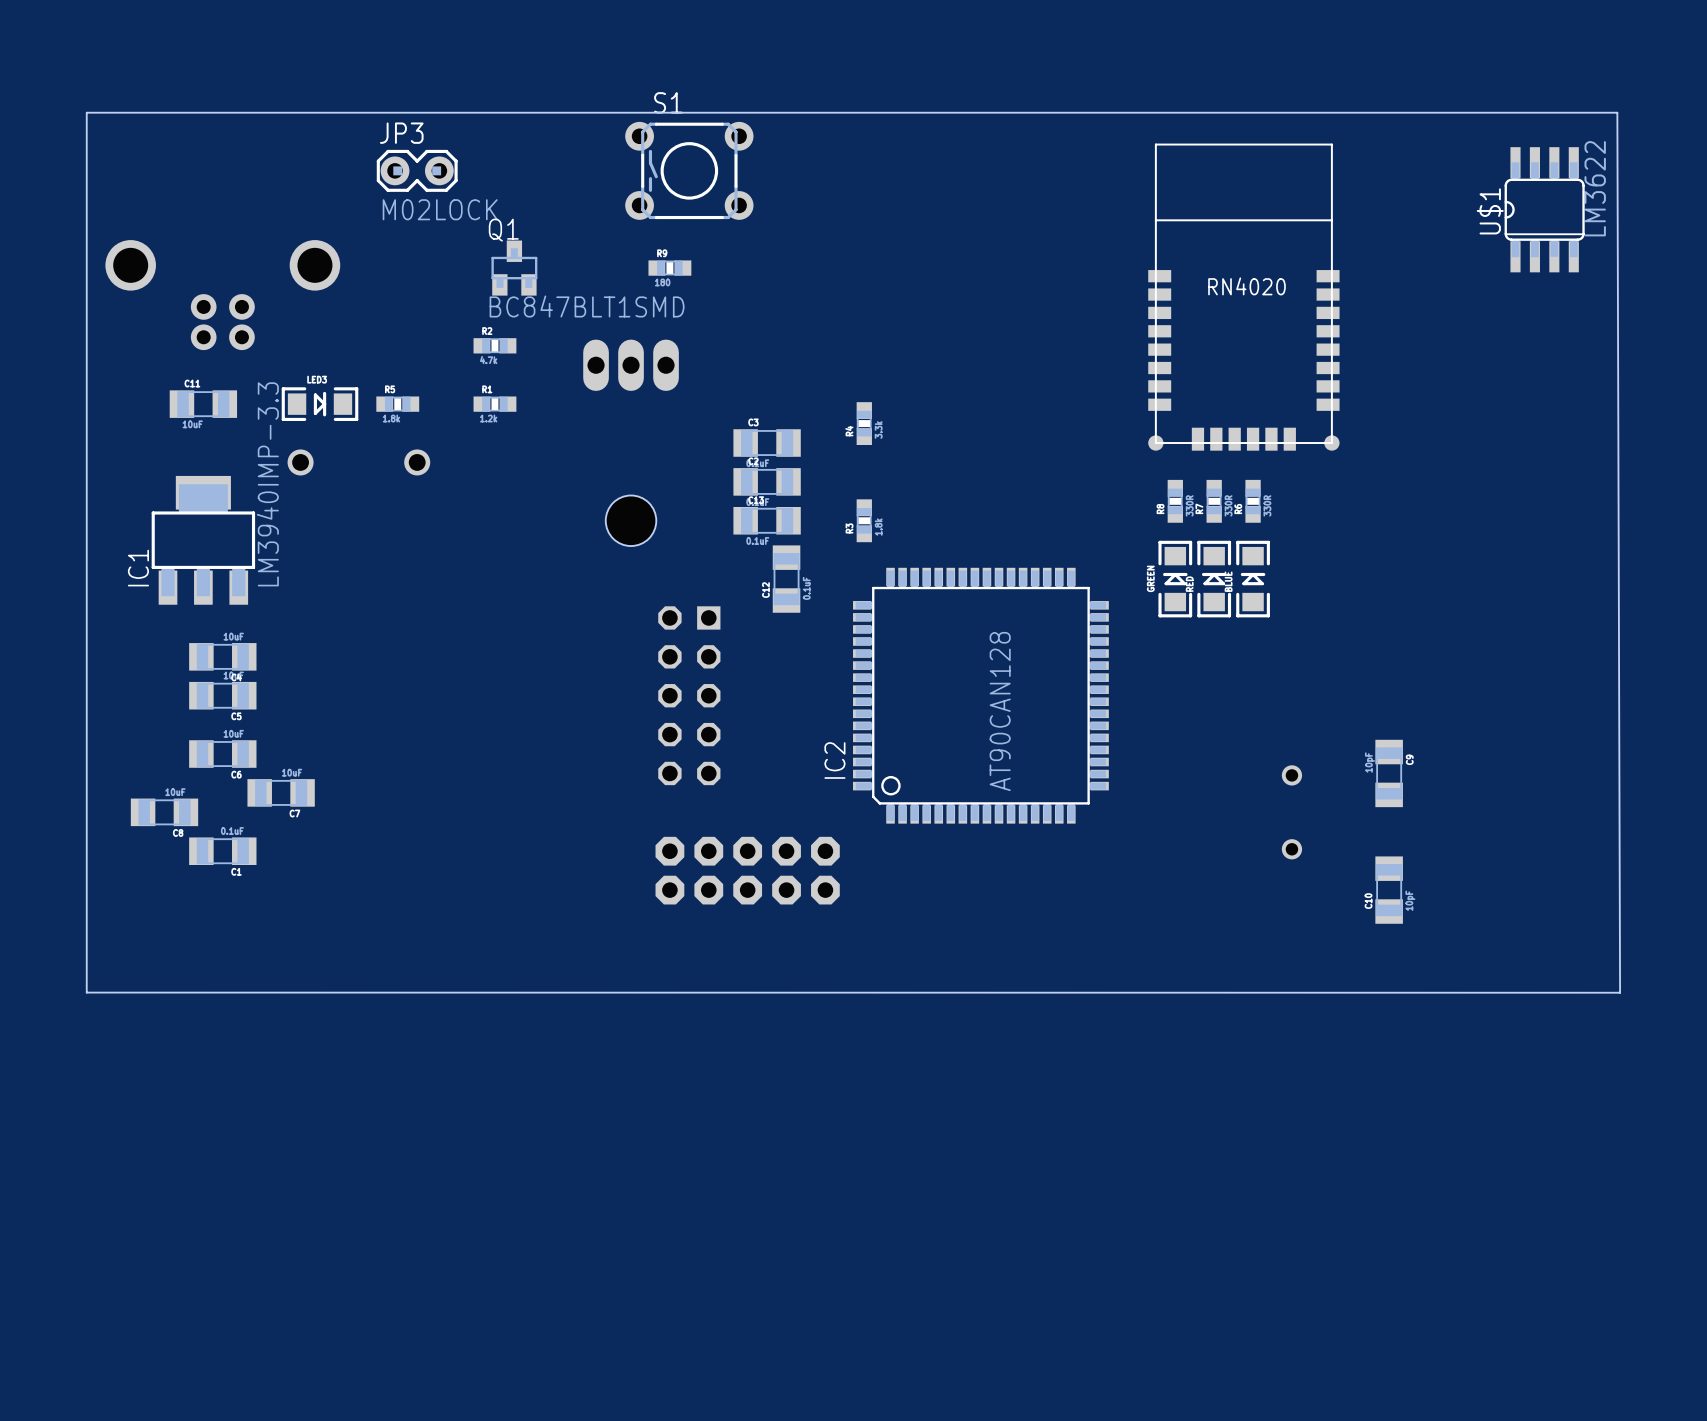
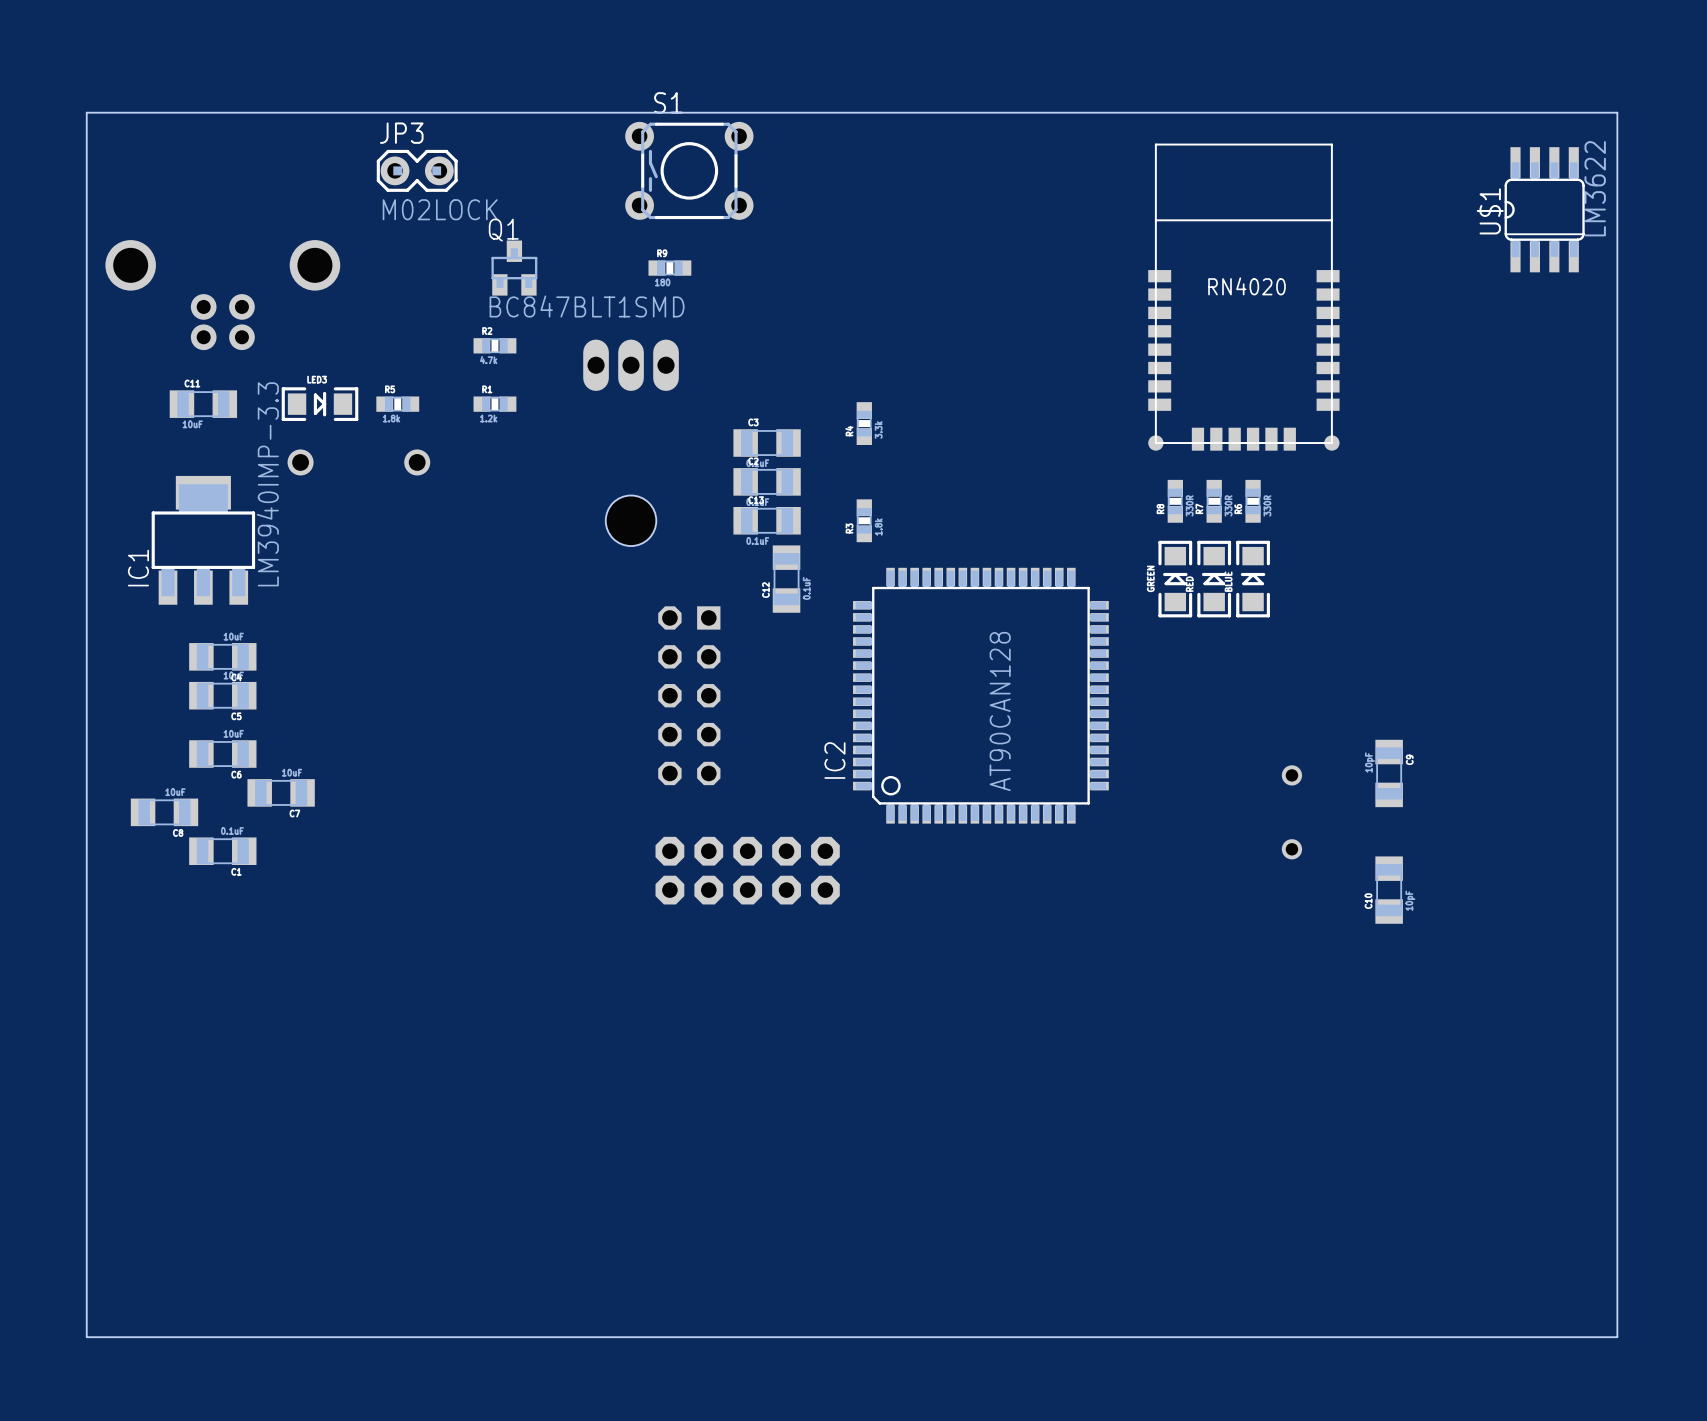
board edge: (1617, 112) (1620, 992) (86, 992) -> (1617, 112) (1617, 1337) (86, 1337) (86, 992)

